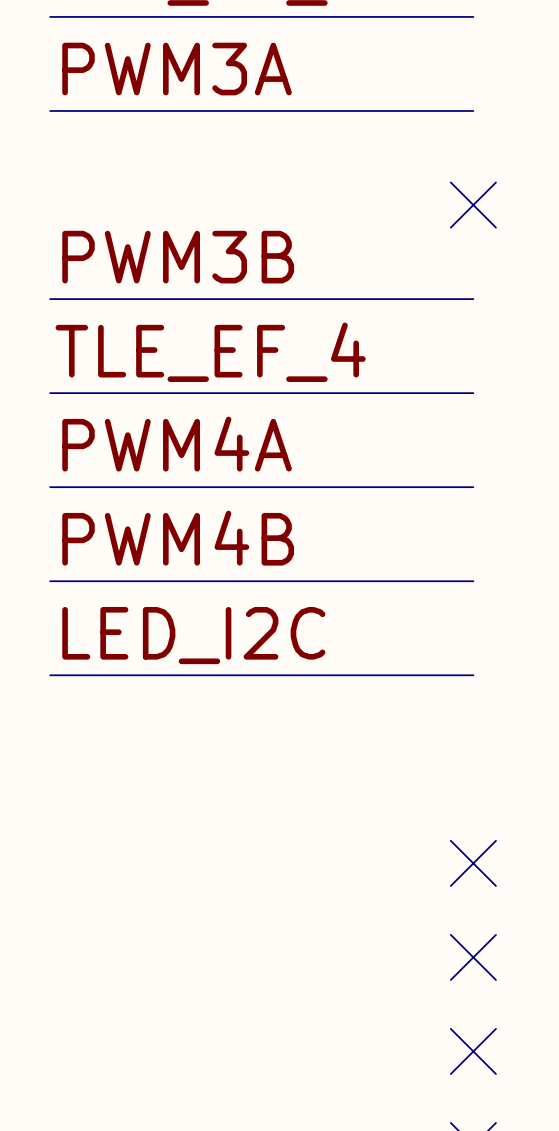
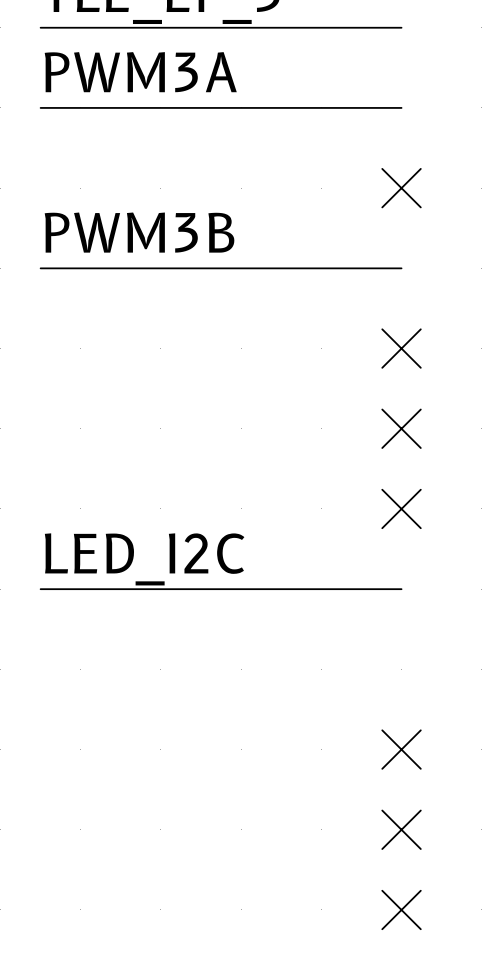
label: TLE_EF_4 (210, 352) -> none
wire: (50, 393) (473, 393) -> none
no-connect mark: none -> (401, 348)
label: PWM4A (177, 444) -> none
wire: (50, 487) (473, 487) -> none
no-connect mark: none -> (401, 428)
label: PWM4B (178, 538) -> none
wire: (50, 581) (473, 581) -> none
no-connect mark: none -> (401, 508)

